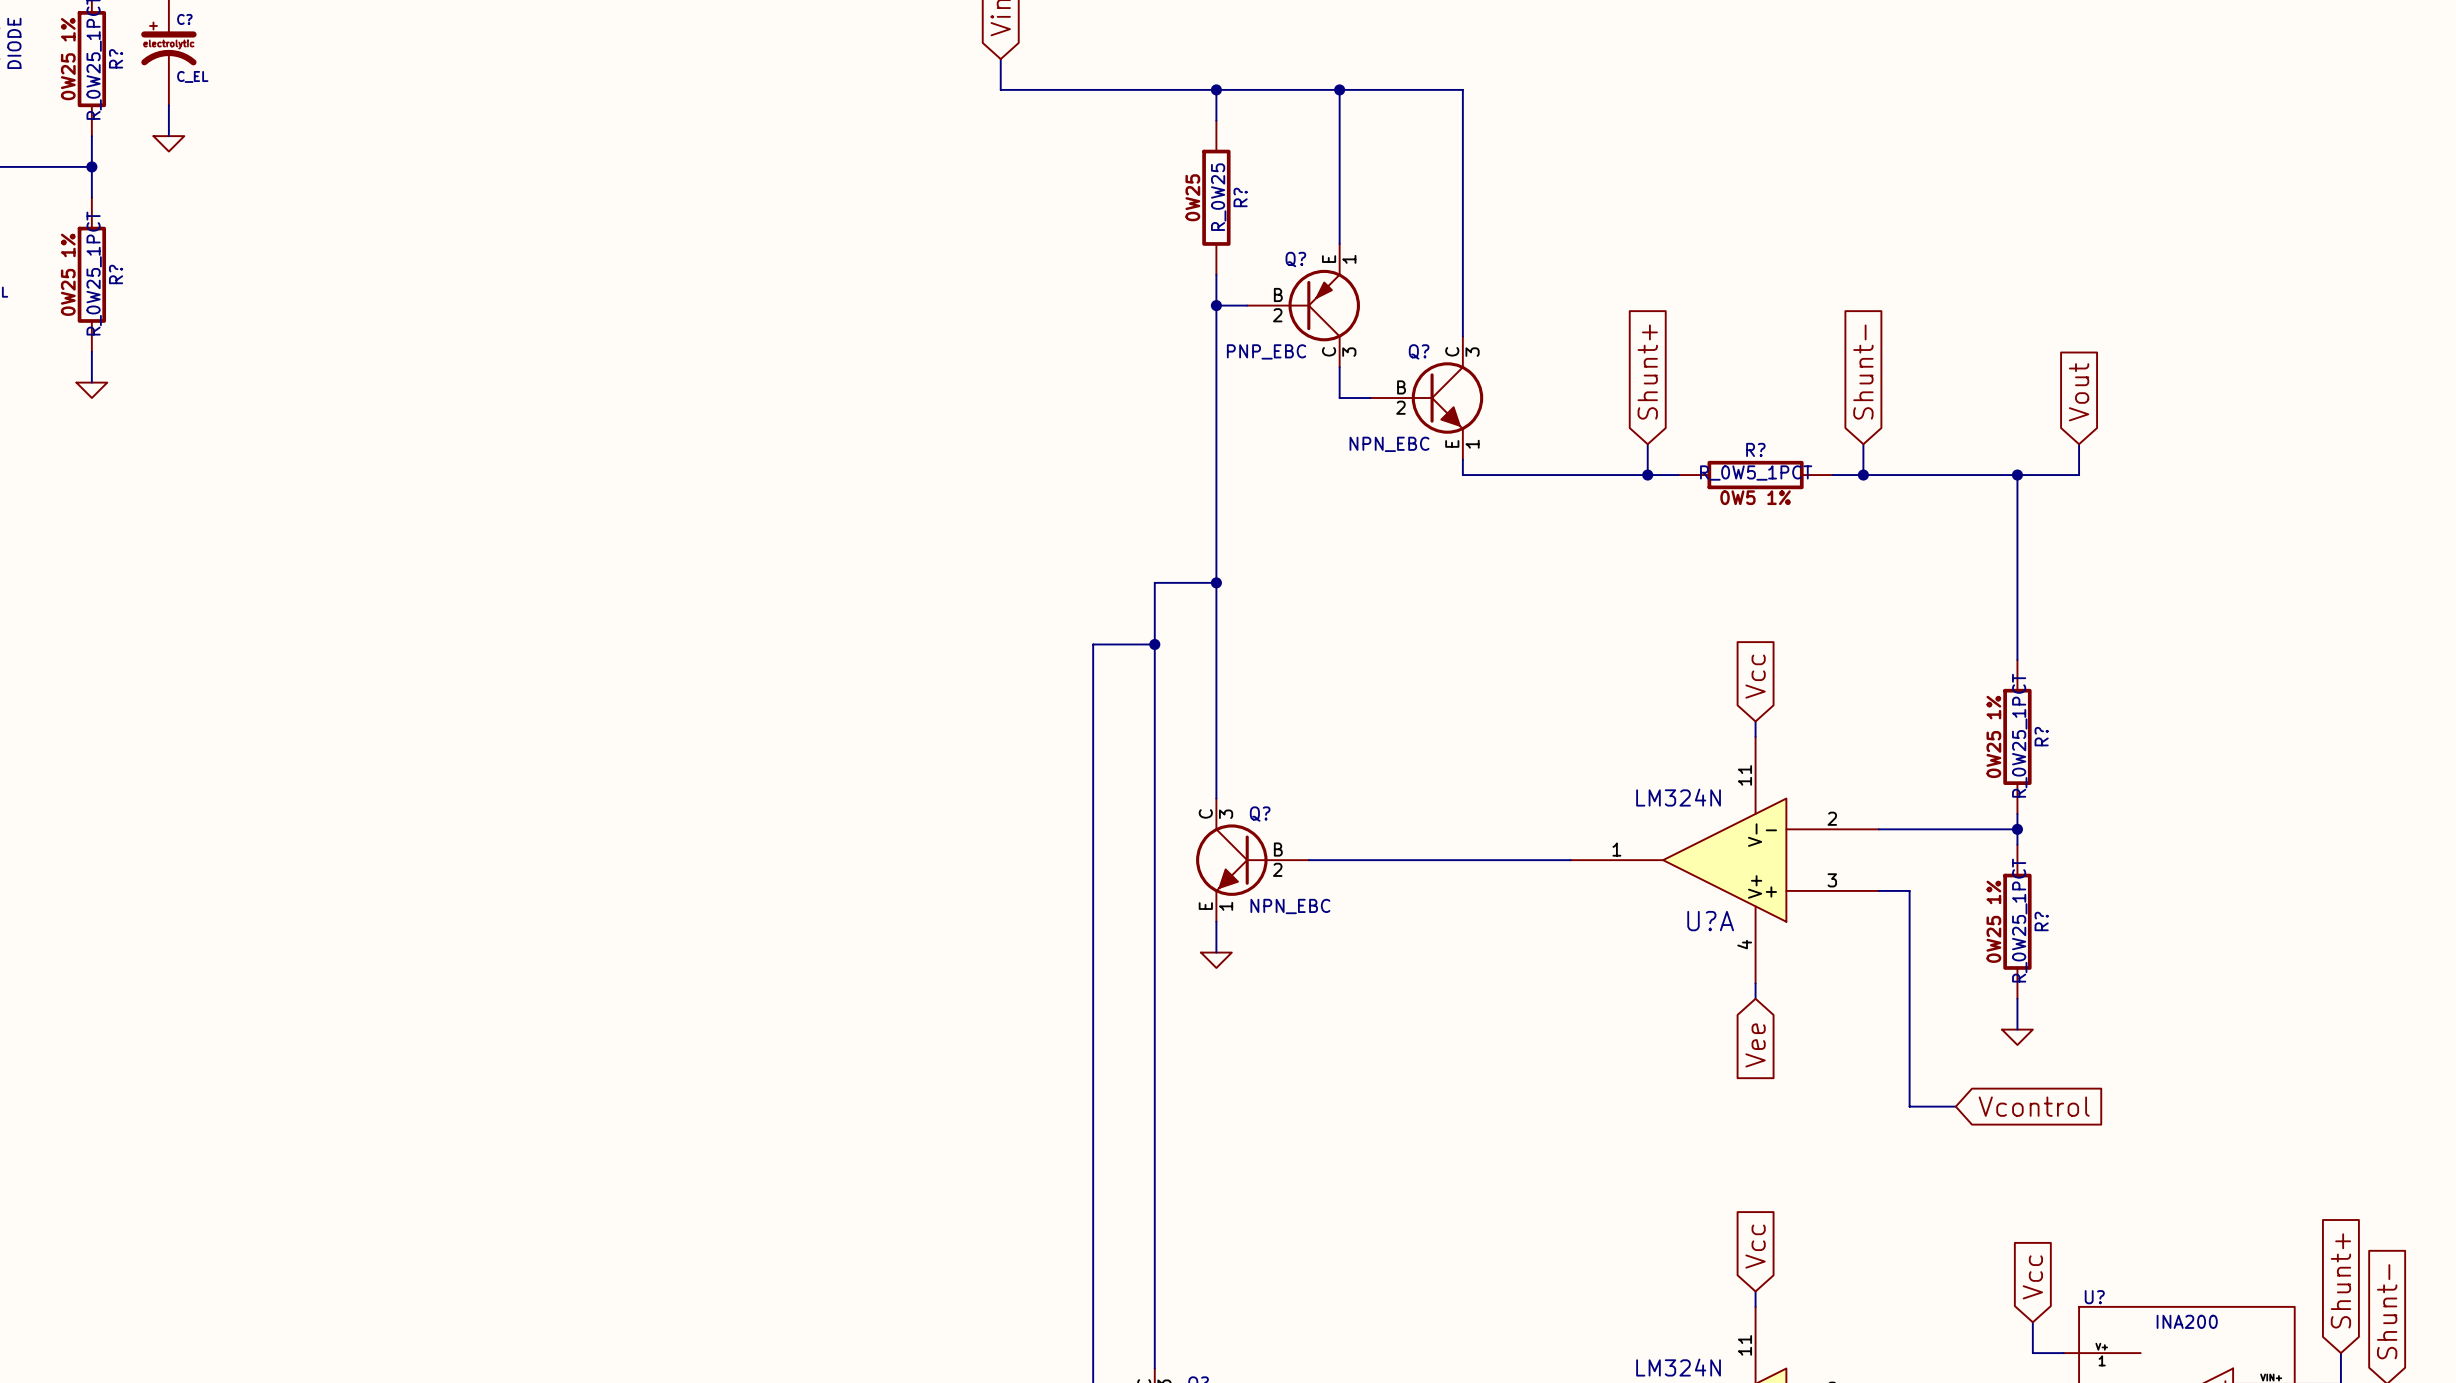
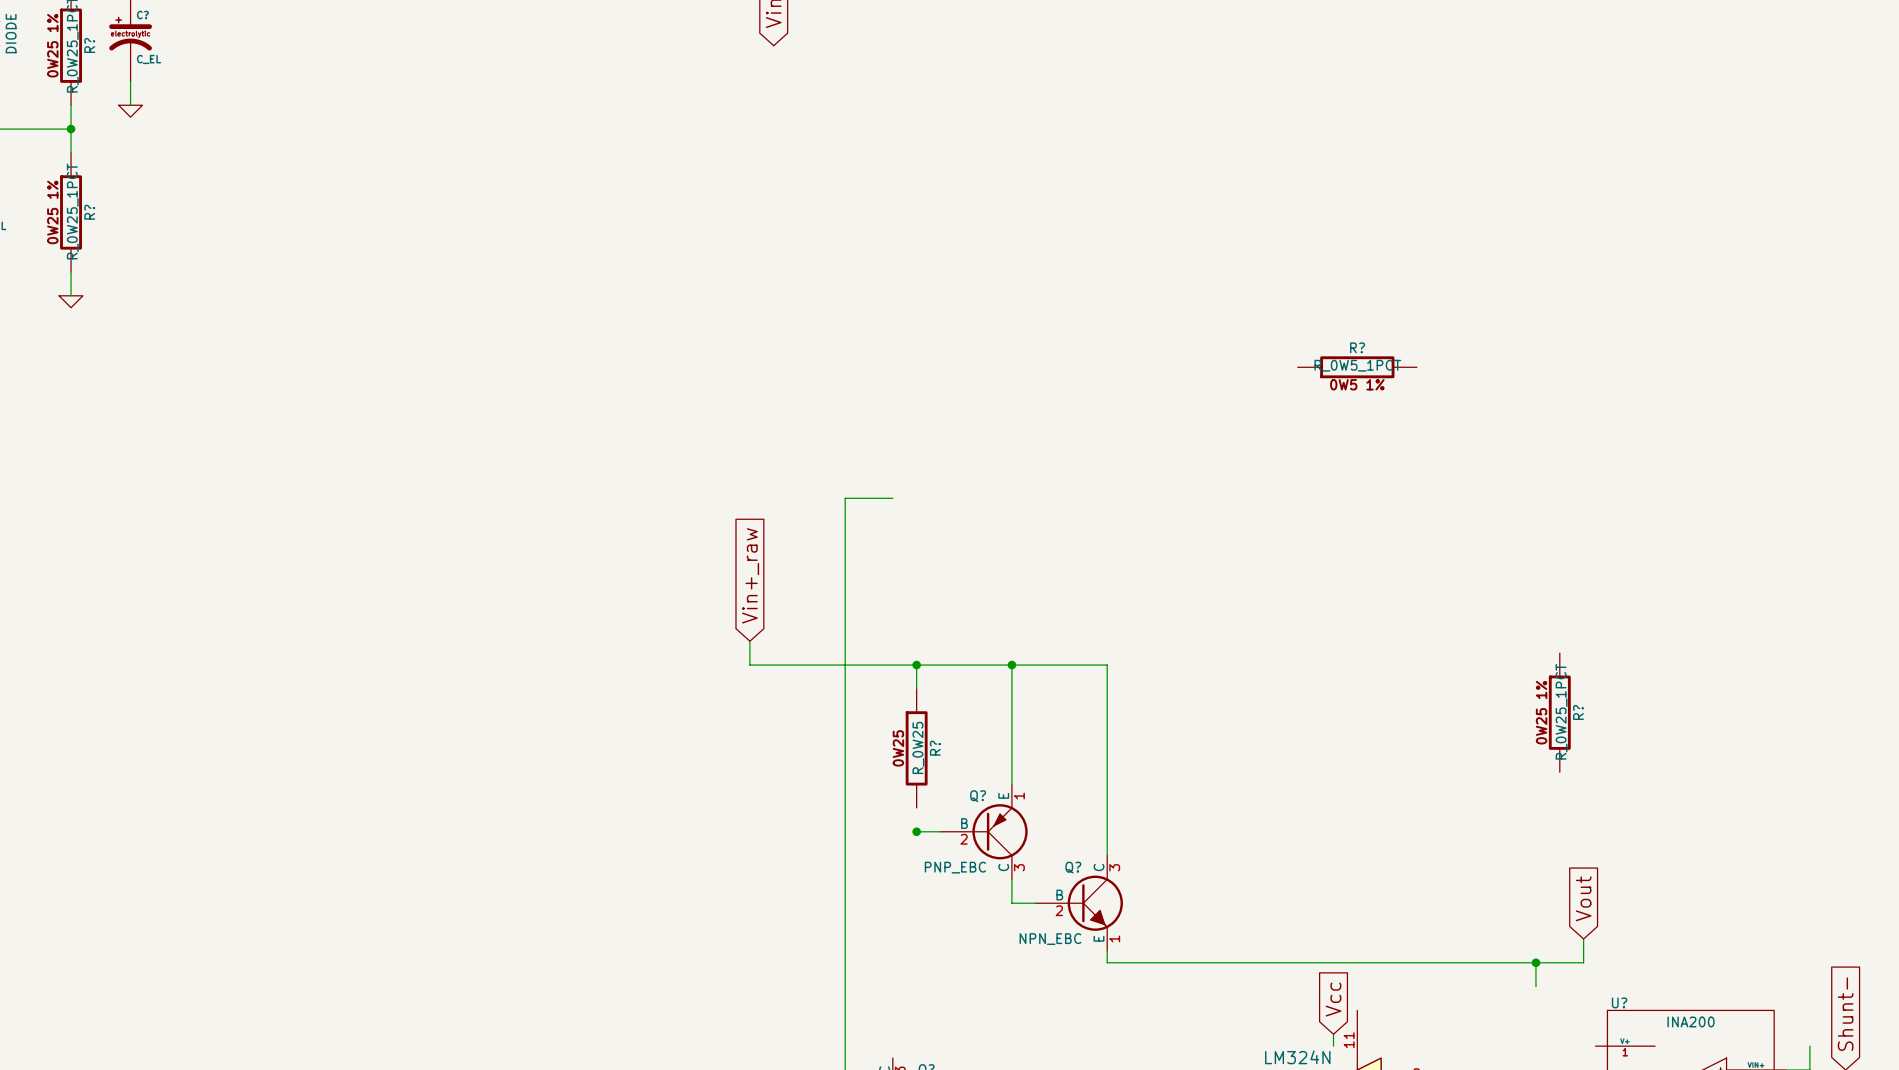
wire: (1000, 59) (1000, 89) (1462, 89) (1462, 336) -> none
wire: (1216, 89) (1216, 120) -> none
junction: (1216, 89) -> none
wire: (1339, 89) (1339, 243) -> none
junction: (1339, 89) -> none
R?: R_0W25 (1216, 197) -> none
wire: (1216, 274) (1216, 798) -> none
wire: (1216, 305) (1247, 305) -> none
junction: (1216, 305) -> none
Q?: PNP_EBC (1303, 305) -> none
wire: (1339, 367) (1339, 398) (1370, 398) -> none
global label: Shunt+ (1647, 372) -> none
global label: Shunt- (1863, 372) -> none
global label: Vout (2079, 392) -> none
Q?: NPN_EBC (1426, 398) -> none
wire: (1647, 444) (1647, 475) -> none
wire: (1863, 444) (1863, 475) -> none
wire: (2079, 444) (2079, 475) (1832, 475) -> none
wire: (1462, 459) (1462, 475) (1678, 475) -> none
junction: (1647, 475) -> none
junction: (1863, 475) -> none
wire: (2017, 475) (2017, 659) -> none
junction: (2017, 475) -> none
wire: (1216, 582) (1154, 582) (1154, 1368) -> none
junction: (1216, 582) -> none
junction: (1154, 644) -> none
global label: Vcc (1755, 676) -> none
wire: (1755, 721) (1755, 736) -> none
R?: R_0W25_1PCT (2017, 736) -> none
global label: none -> Vin+_raw (750, 575)
wire: (2017, 813) (2017, 844) -> none
wire: none -> (749, 641) (749, 665) (1011, 665) (1011, 784)
wire: (1878, 829) (2017, 829) -> none
junction: (2017, 829) -> none
junction: none -> (916, 665)
Q?: NPN_EBC (1252, 860) -> none
junction: none -> (1011, 665)
wire: (1432, 860) (1570, 860) -> (1107, 665) (1107, 855)
U?A: LM324N (1724, 860) -> none
wire: (1878, 890) (1909, 890) (1909, 1106) (1955, 1106) -> none
wire: (1216, 921) (1216, 952) -> (916, 665) (916, 688)
power symbol: (1216, 960) -> none
R?: none -> R_0W25 (916, 748)
wire: (1755, 983) (1755, 998) -> none
wire: (2017, 998) (2017, 1029) -> (1535, 962) (1535, 986)
power symbol: (2017, 1037) -> none
global label: Vee (1755, 1045) -> none
wire: none -> (916, 831) (940, 831)
junction: none -> (916, 831)
Q?: none -> PNP_EBC (984, 831)
global label: Vcontrol (2034, 1106) -> none
wire: none -> (1011, 879) (1011, 903) (1035, 903)
global label: none -> Vout (1583, 898)
Q?: none -> NPN_EBC (1079, 903)
wire: none -> (1583, 938) (1583, 962) (1107, 962) (1107, 950)
junction: none -> (1535, 962)
global label position: Vcc (1755, 1246) -> Vcc (1333, 999)
global label: Vcc (2032, 1277) -> none
global label: Shunt+ (2340, 1280) -> none
wire: (1755, 1291) (1755, 1306) -> (1333, 1034) (1333, 1046)
wire: (2032, 1322) (2032, 1353) (2063, 1353) -> none

